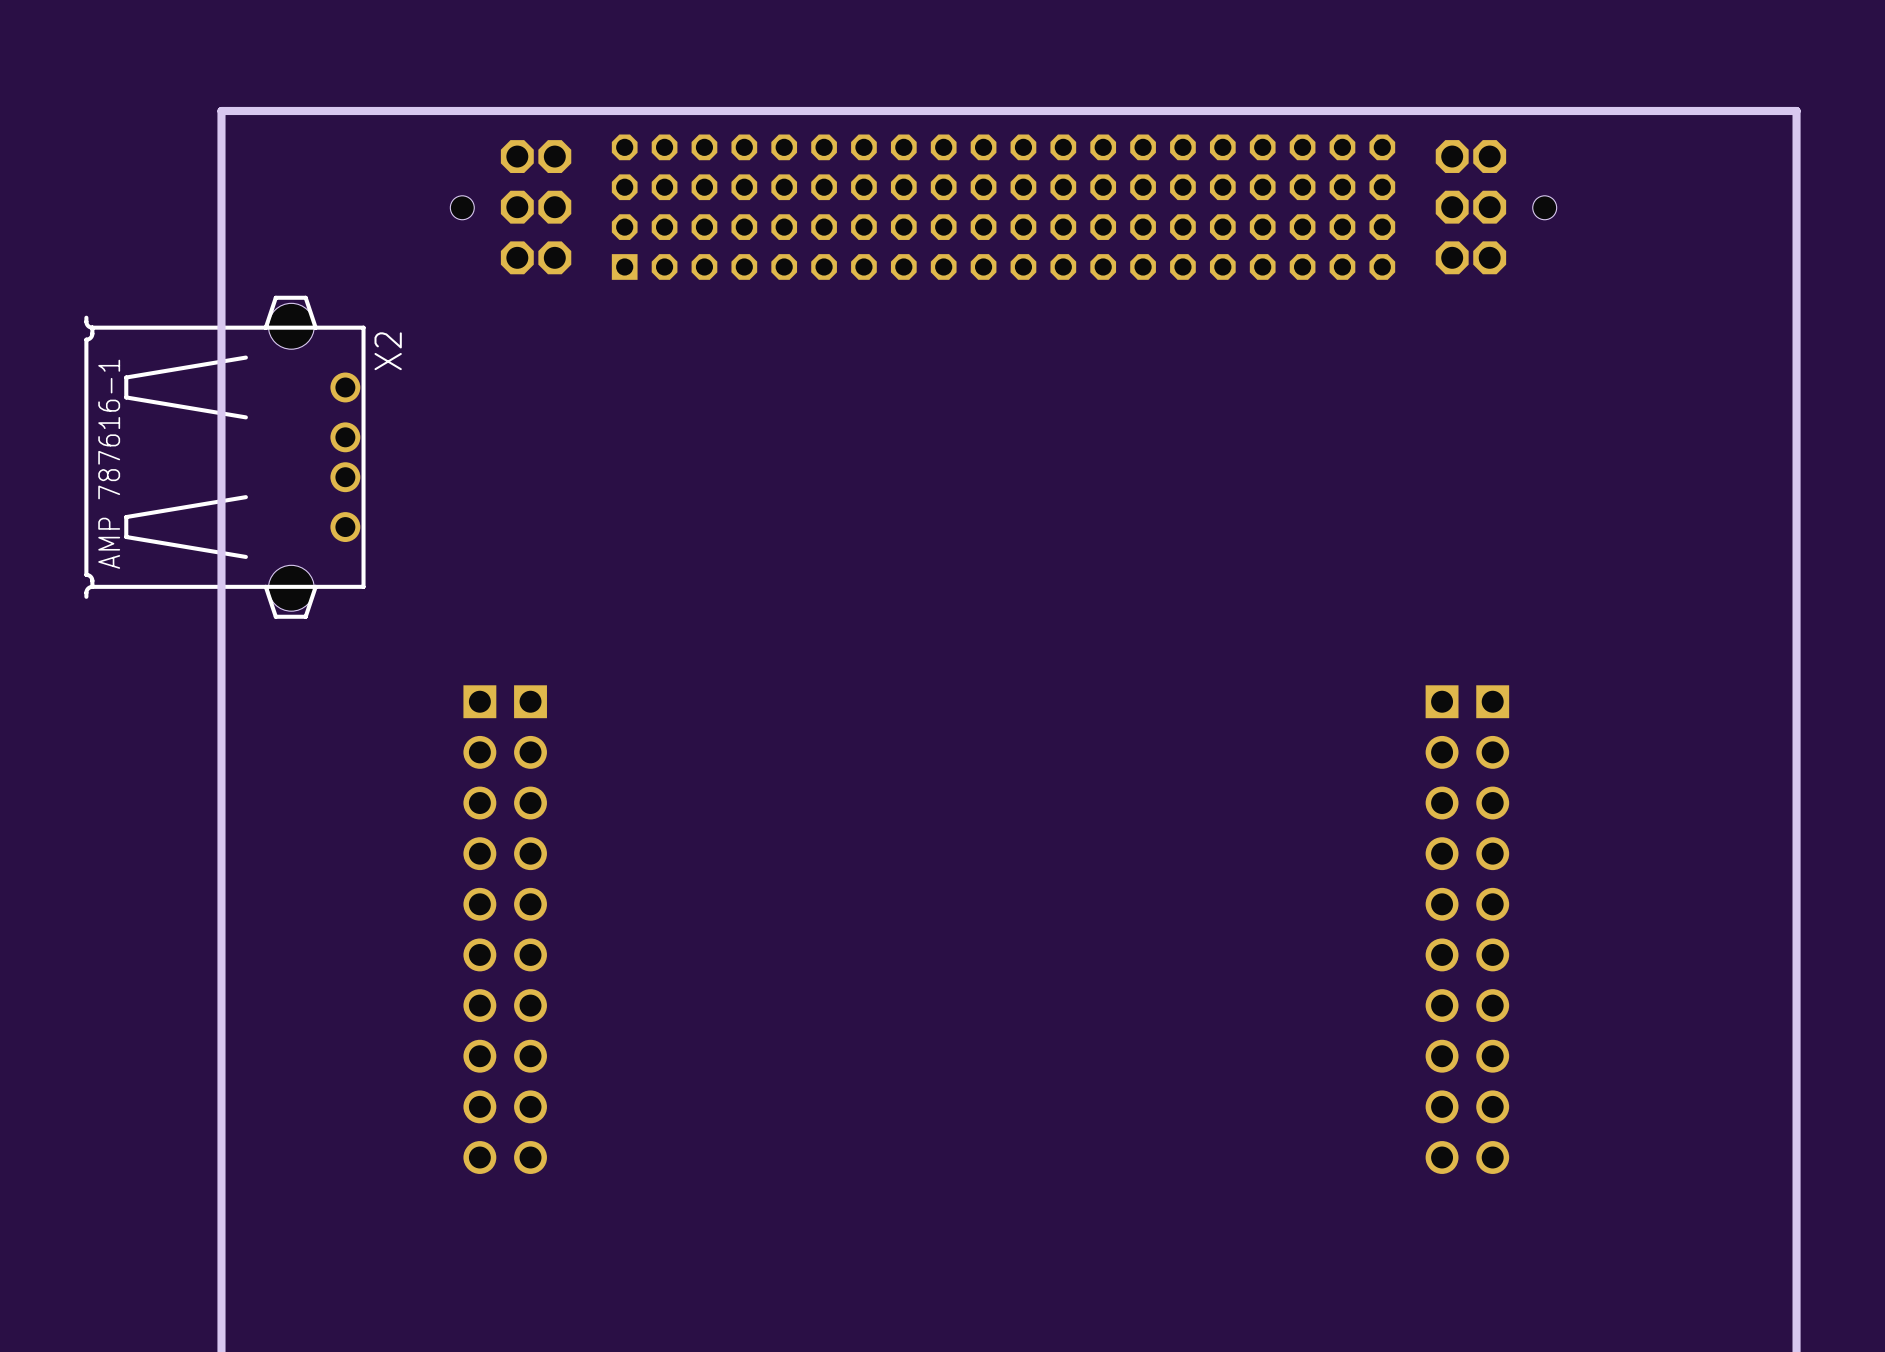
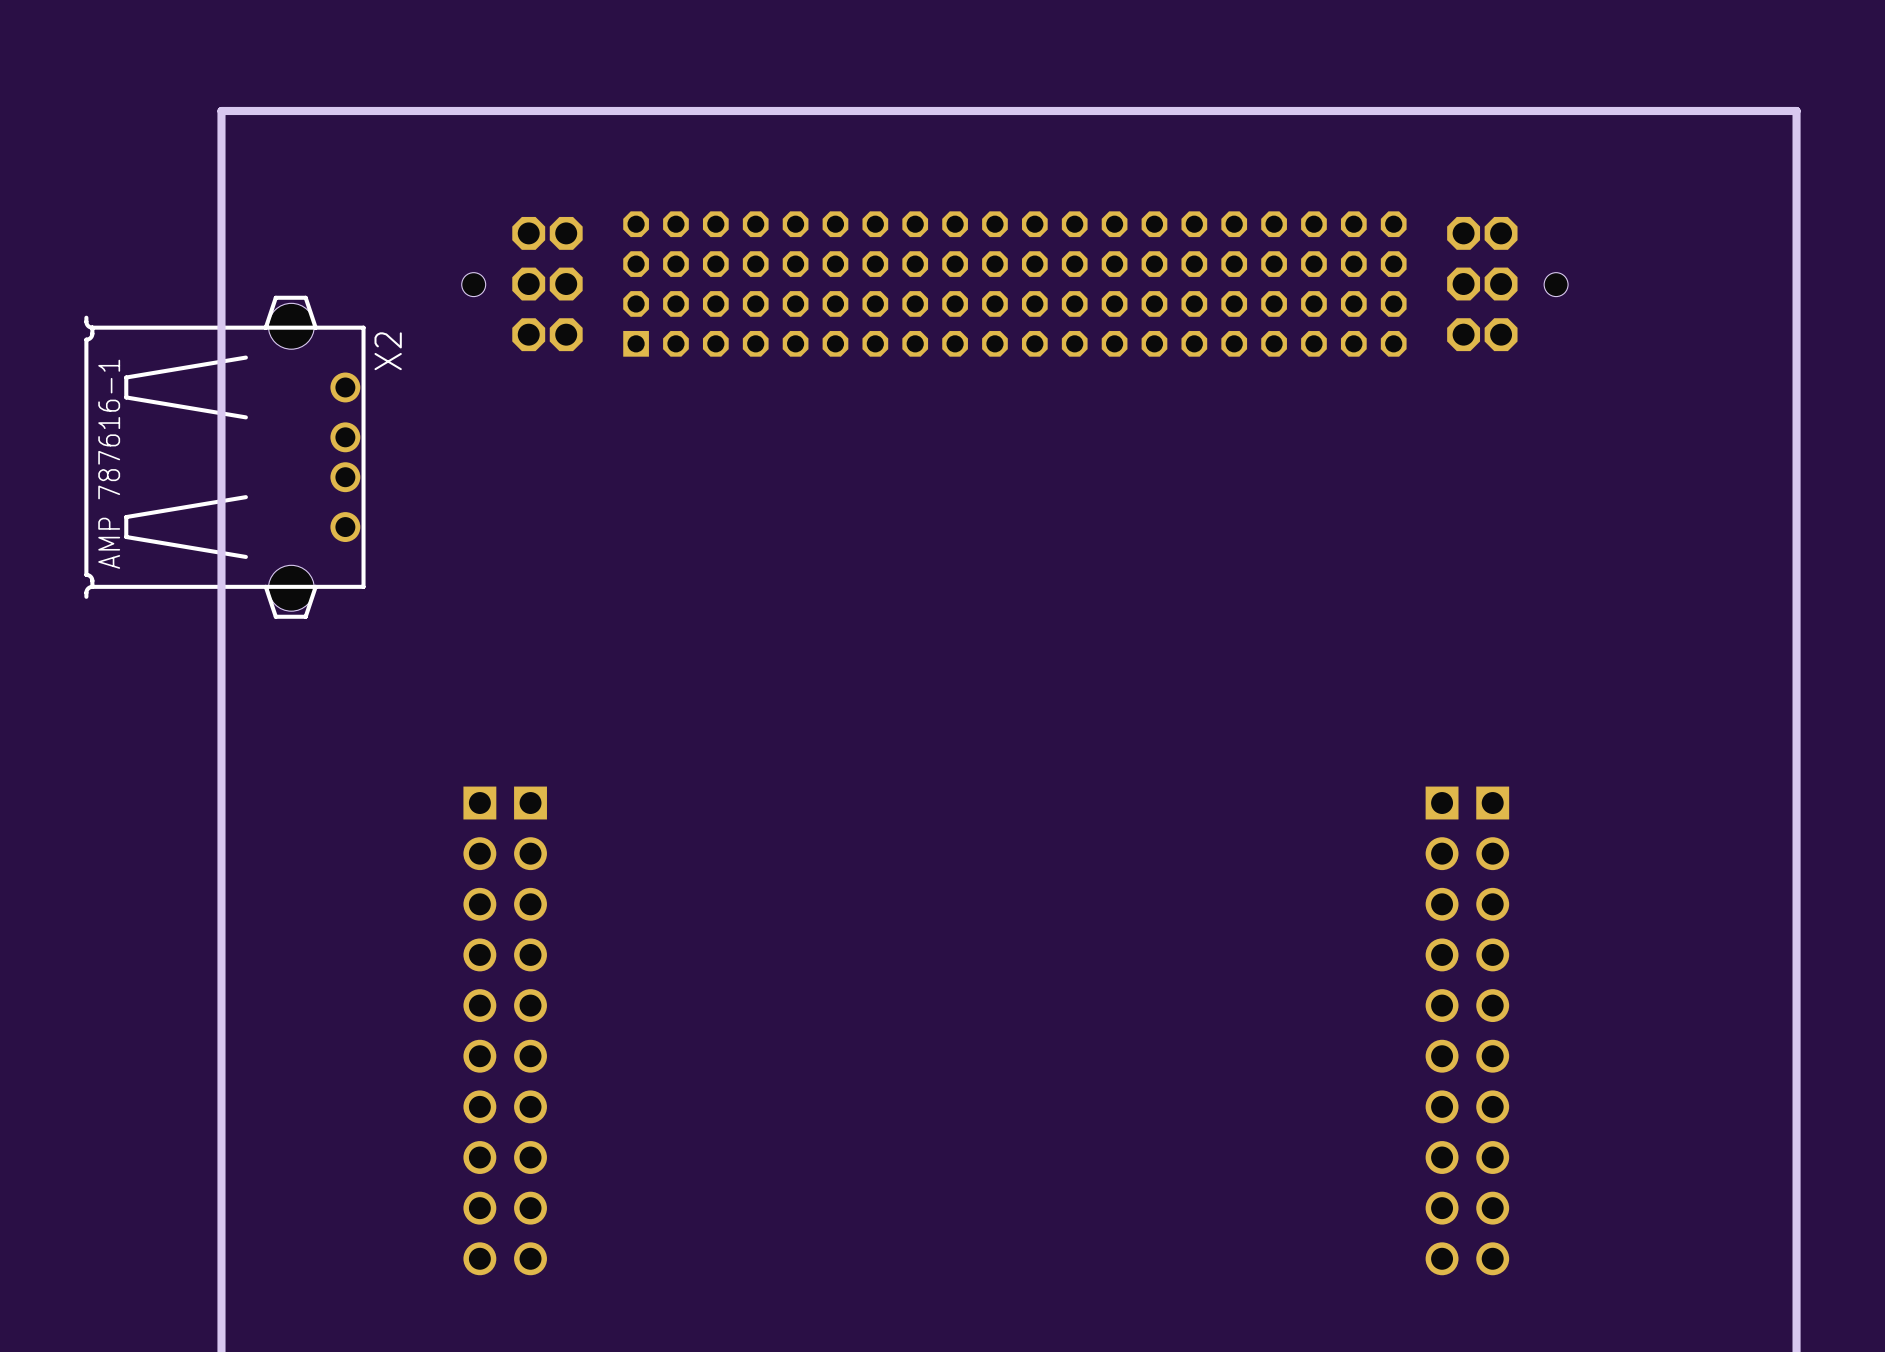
part position: (1003, 207) -> (1014, 284)
part: (479, 929) -> none
part: (530, 929) -> none
part: (1442, 929) -> none
part: (1492, 929) -> none
part: none -> (479, 1030)
part: none -> (530, 1030)
part: none -> (1442, 1030)
part: none -> (1492, 1030)

